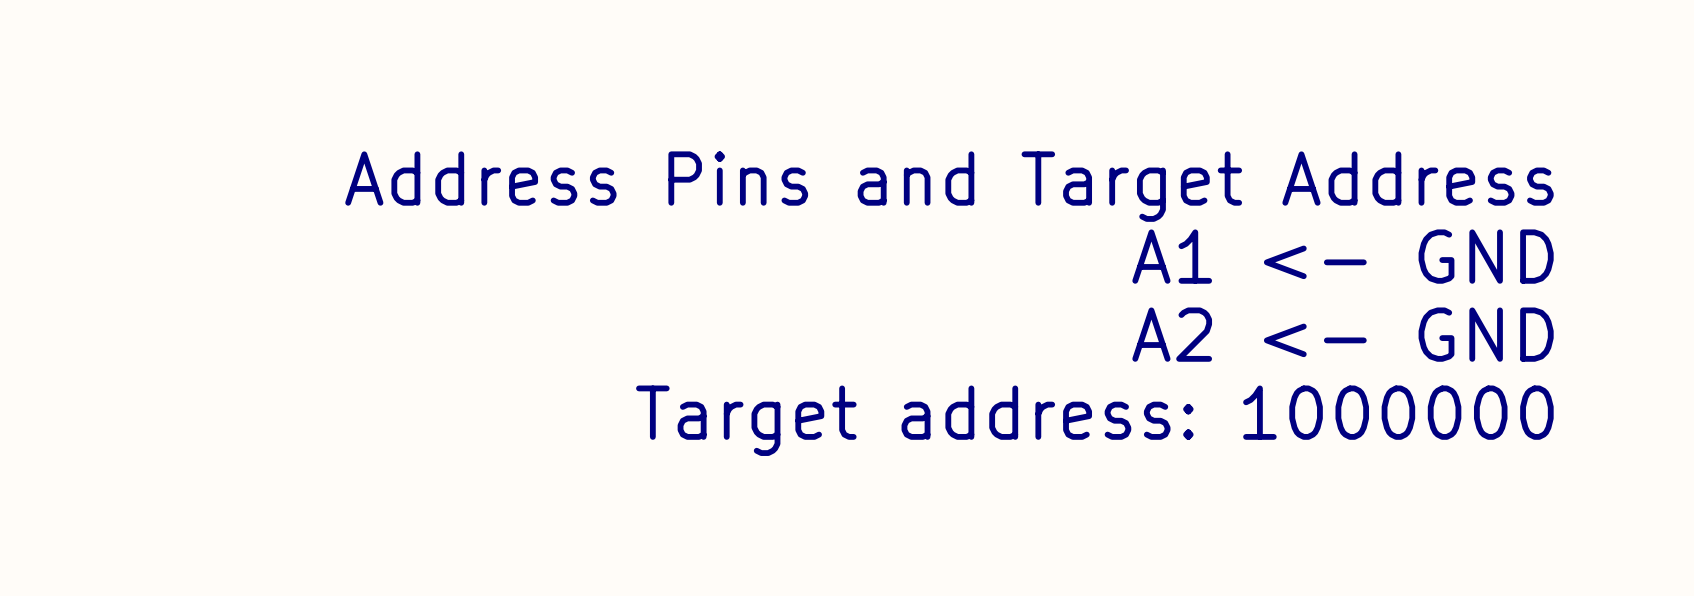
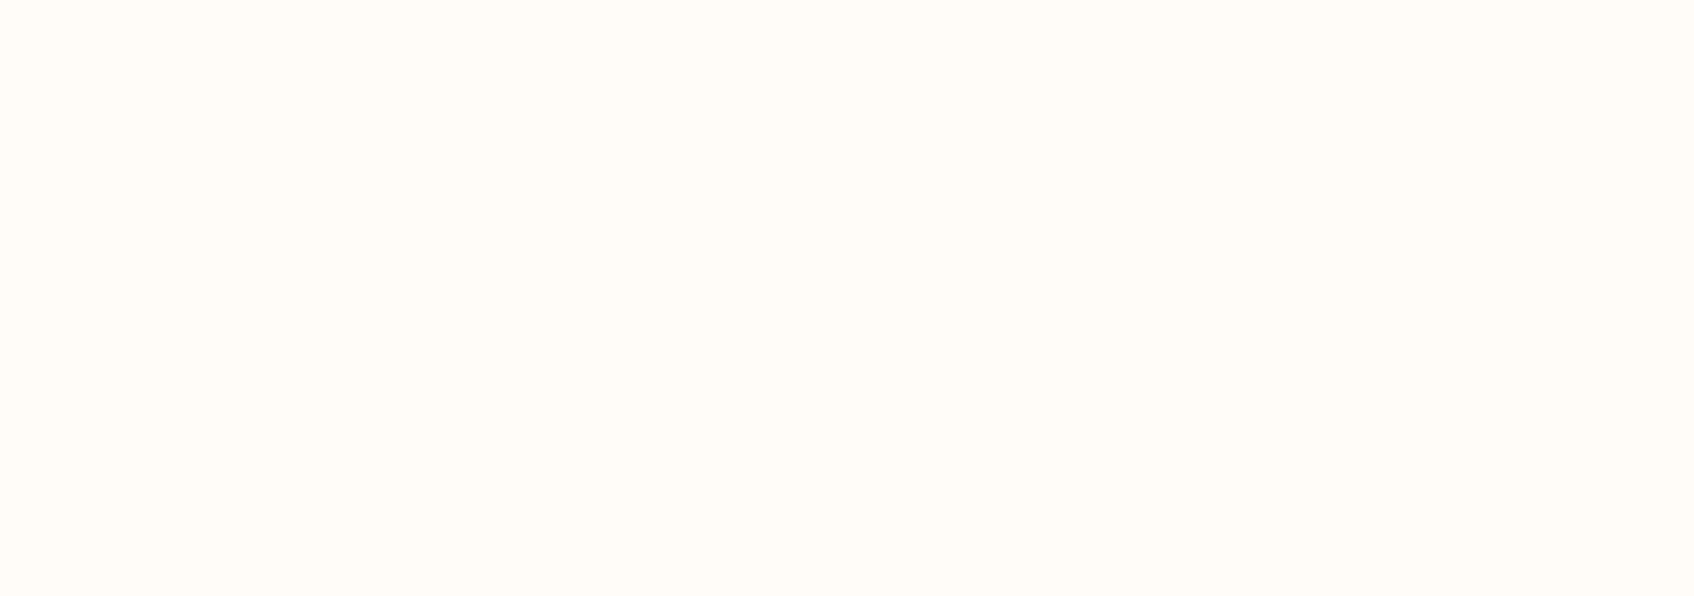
text: Address Pins and Target Address (949, 186) -> none
text: A1 <- GND (1343, 256) -> none
text: A2 <- GND (1343, 334) -> none
text: Target address: 1000000 (1094, 420) -> none

